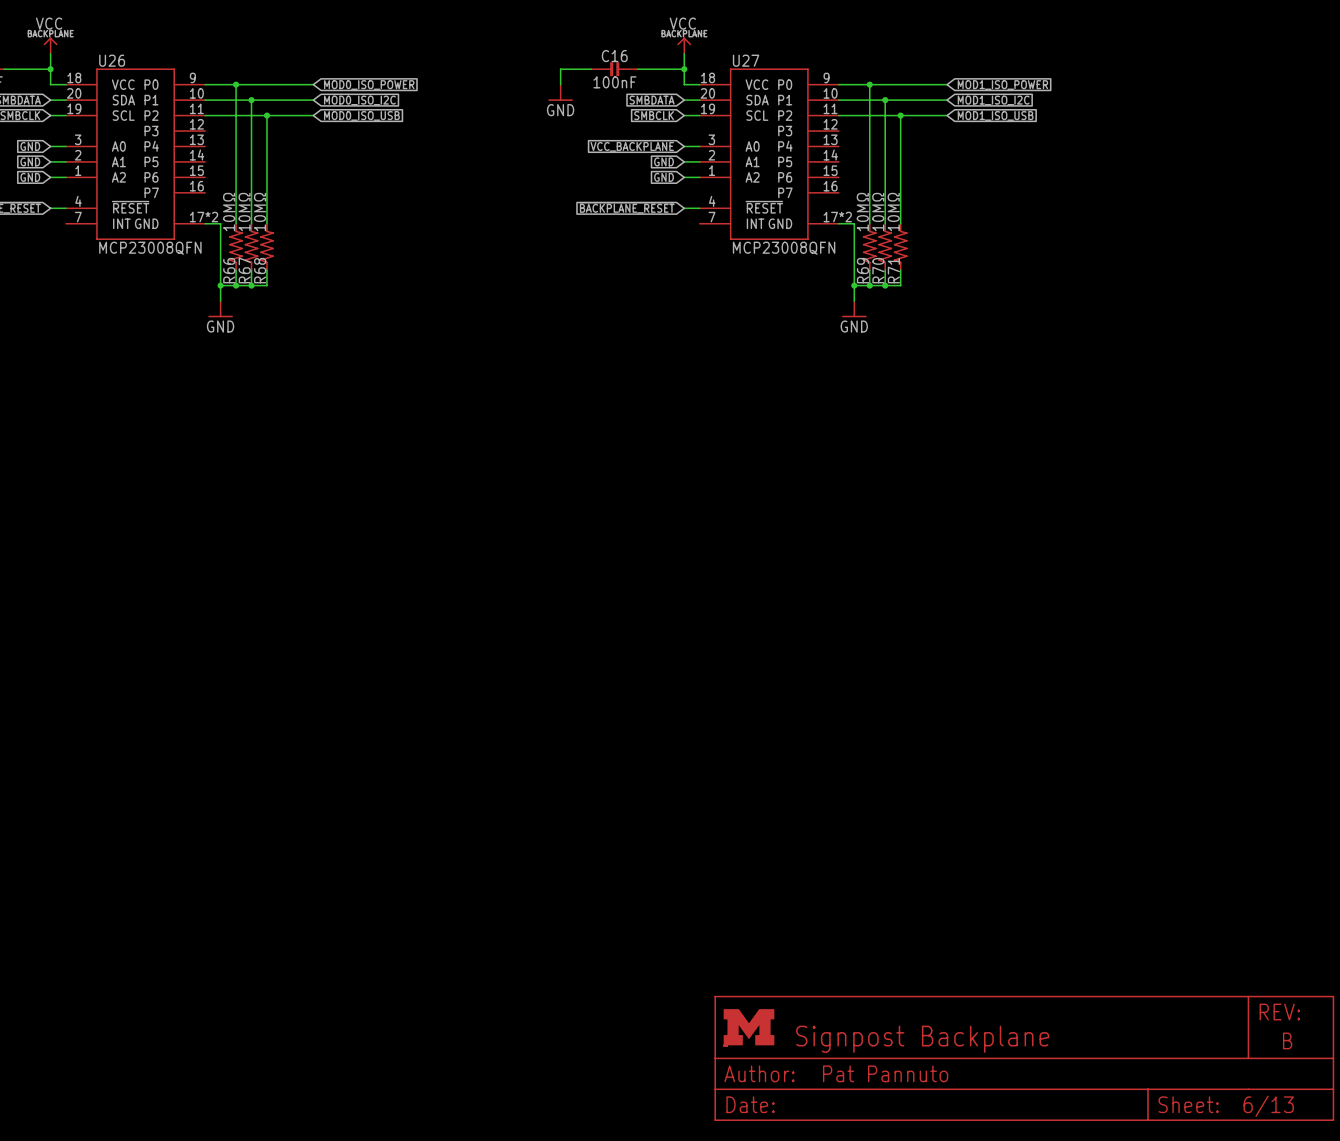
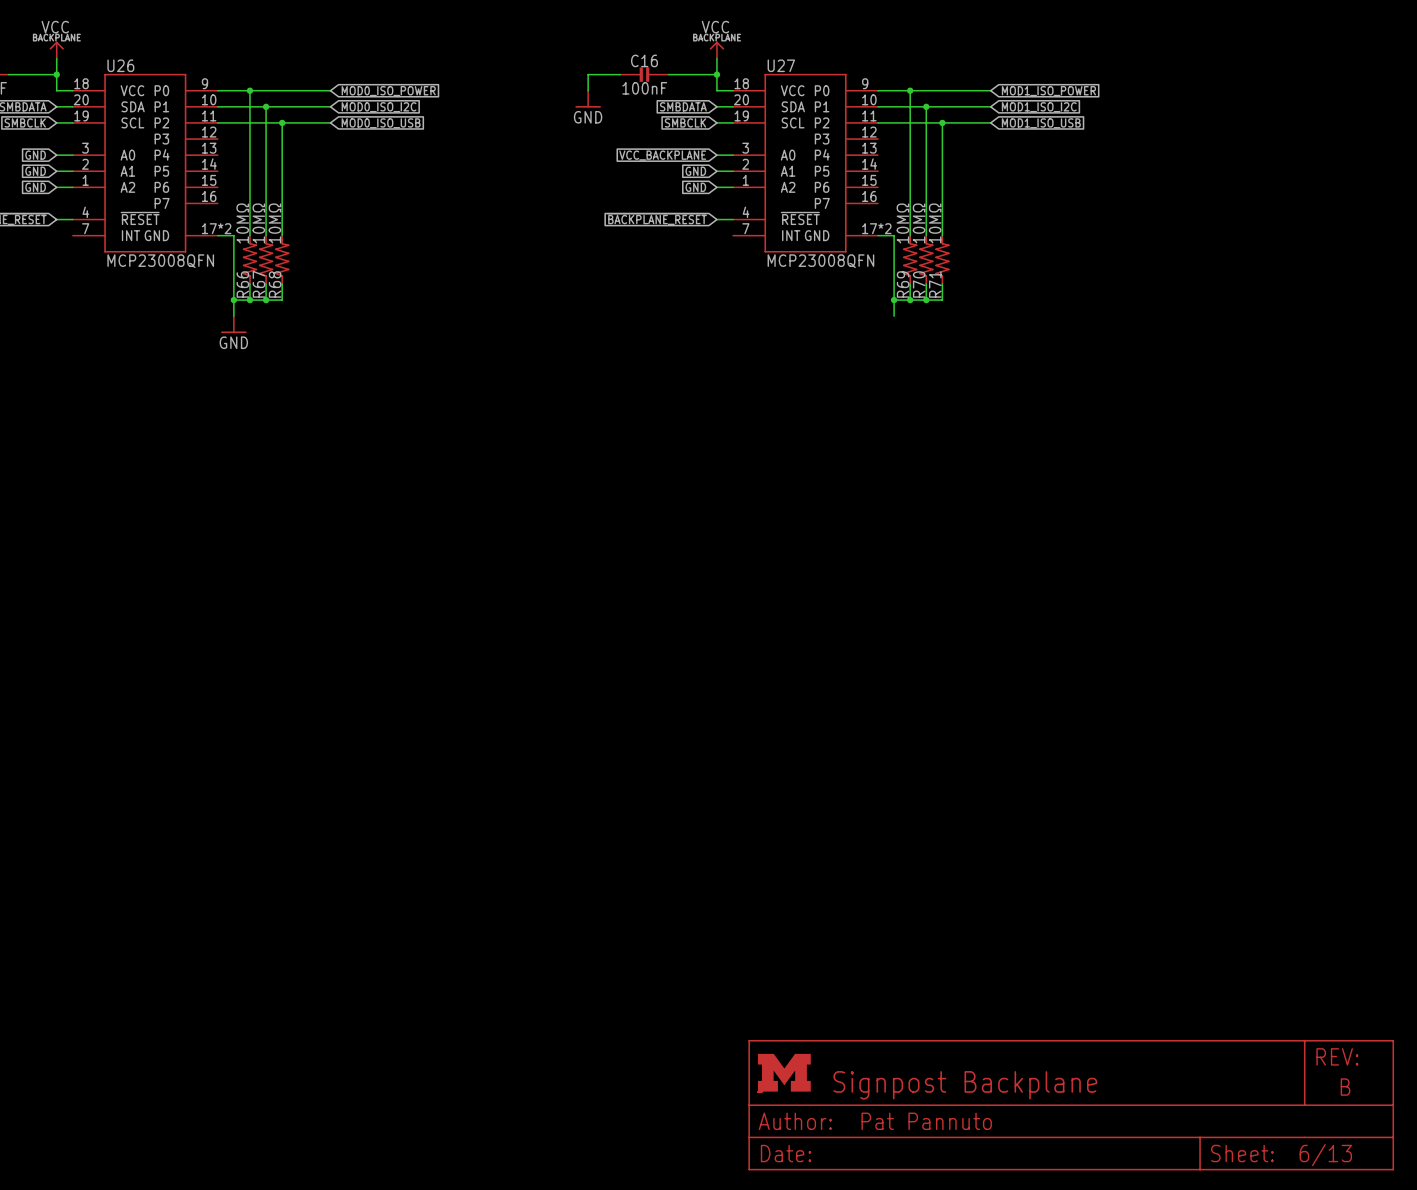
power symbol: GND (854, 309) -> none

